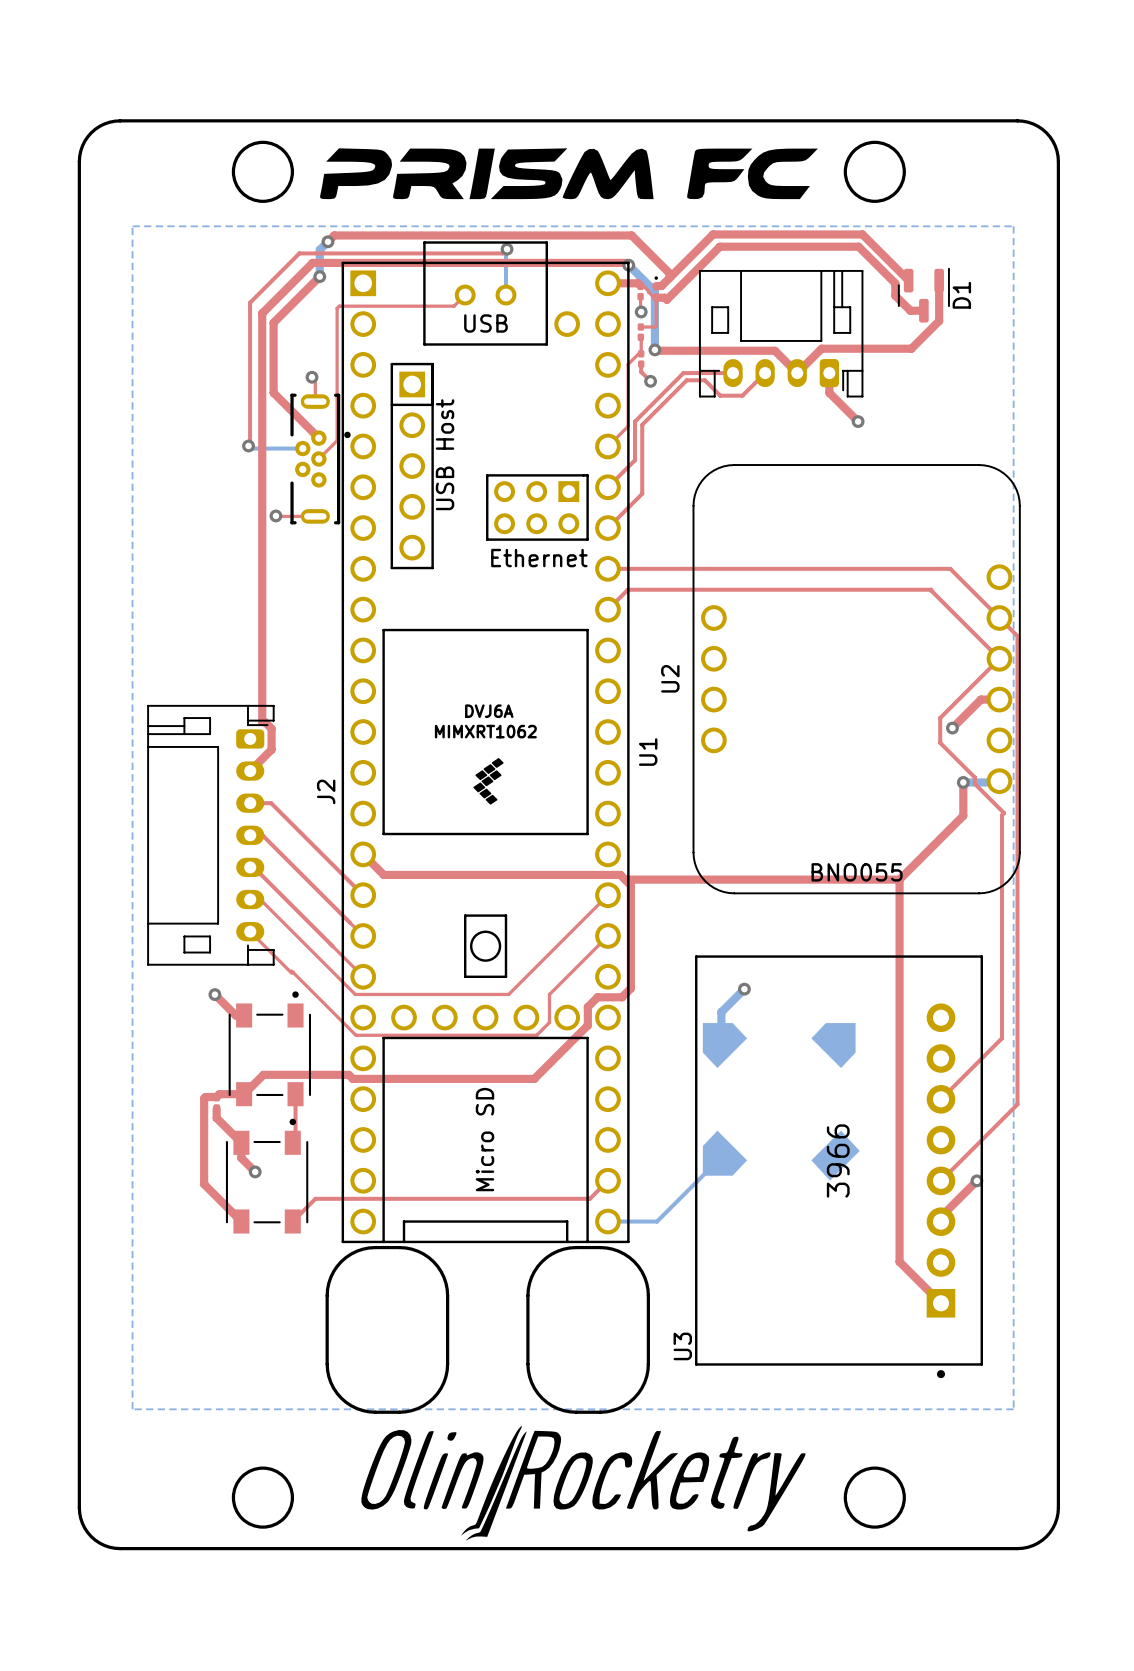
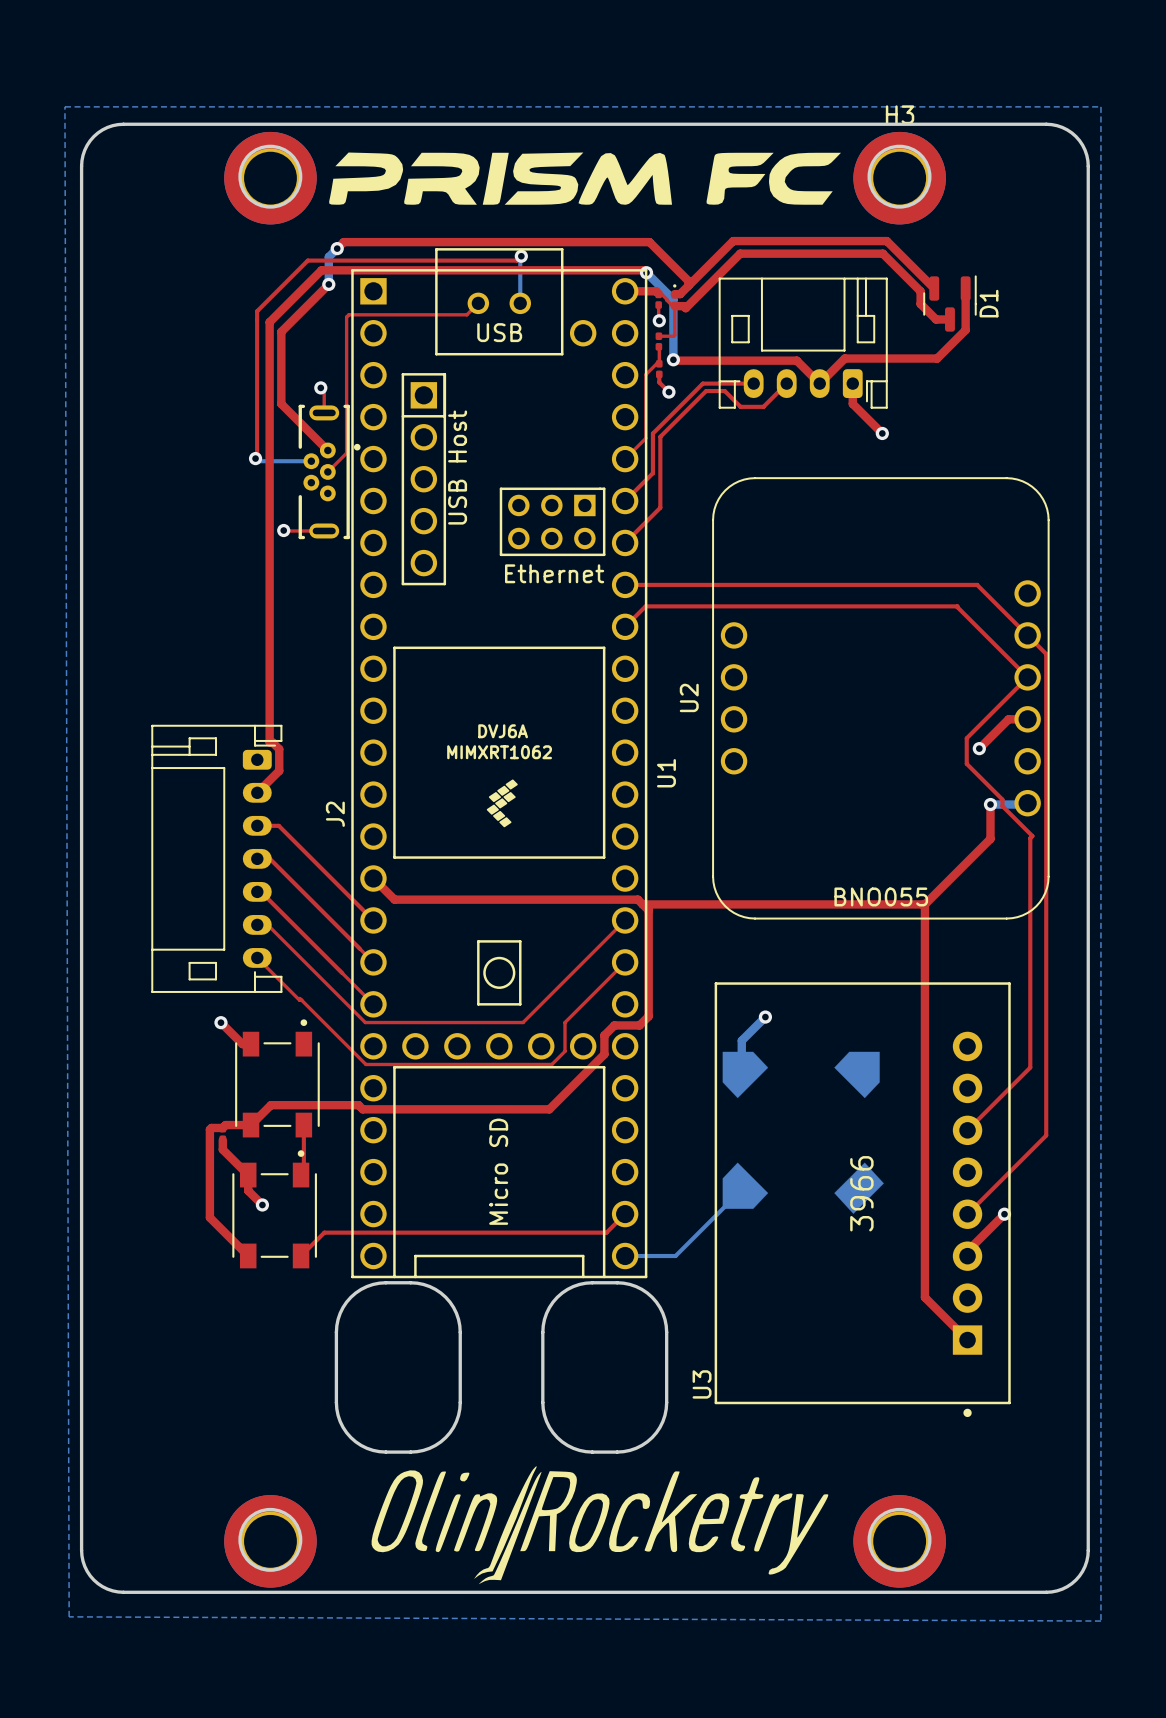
part: none -> (270, 178)
H3: none -> (899, 178)
bottom zone outline: (132, 226) (132, 1409) (1013, 1409) (1013, 226) (132, 226) -> (64, 106) (69, 1616) (1100, 1621) (1100, 106) (64, 106)
part: none -> (270, 1541)
part: none -> (899, 1541)

